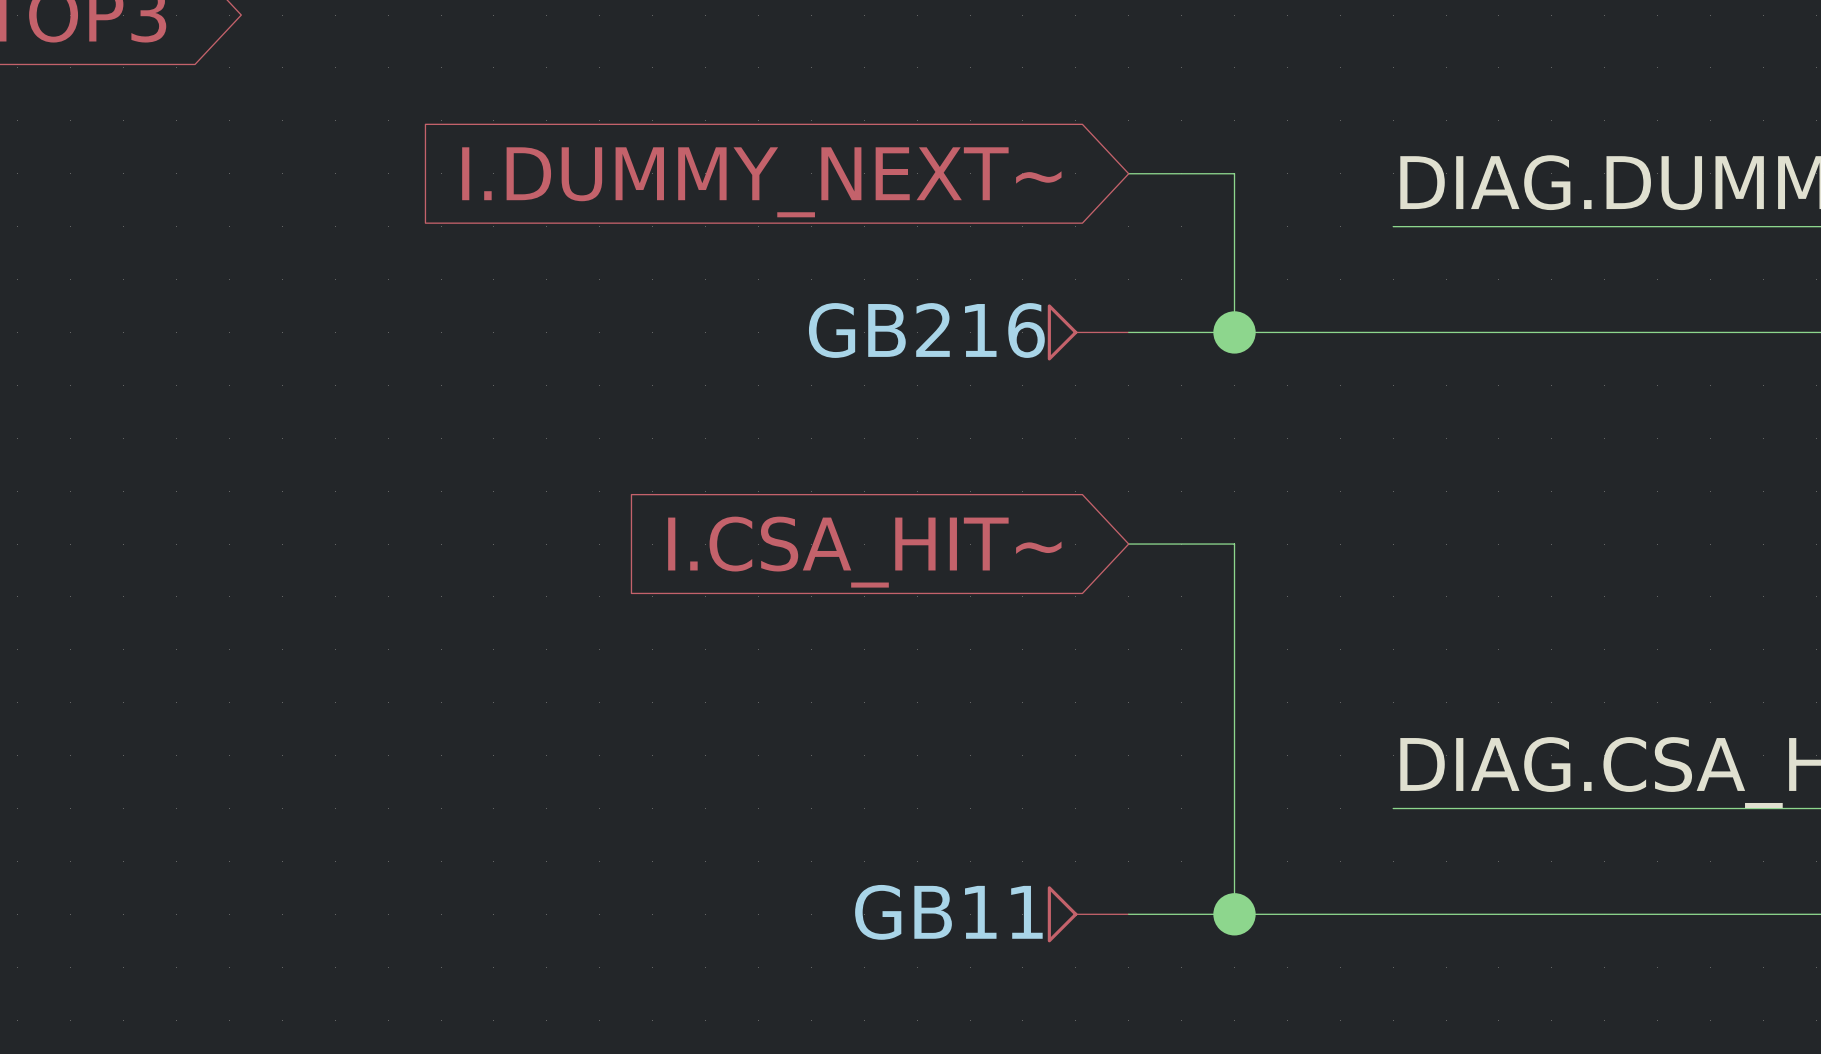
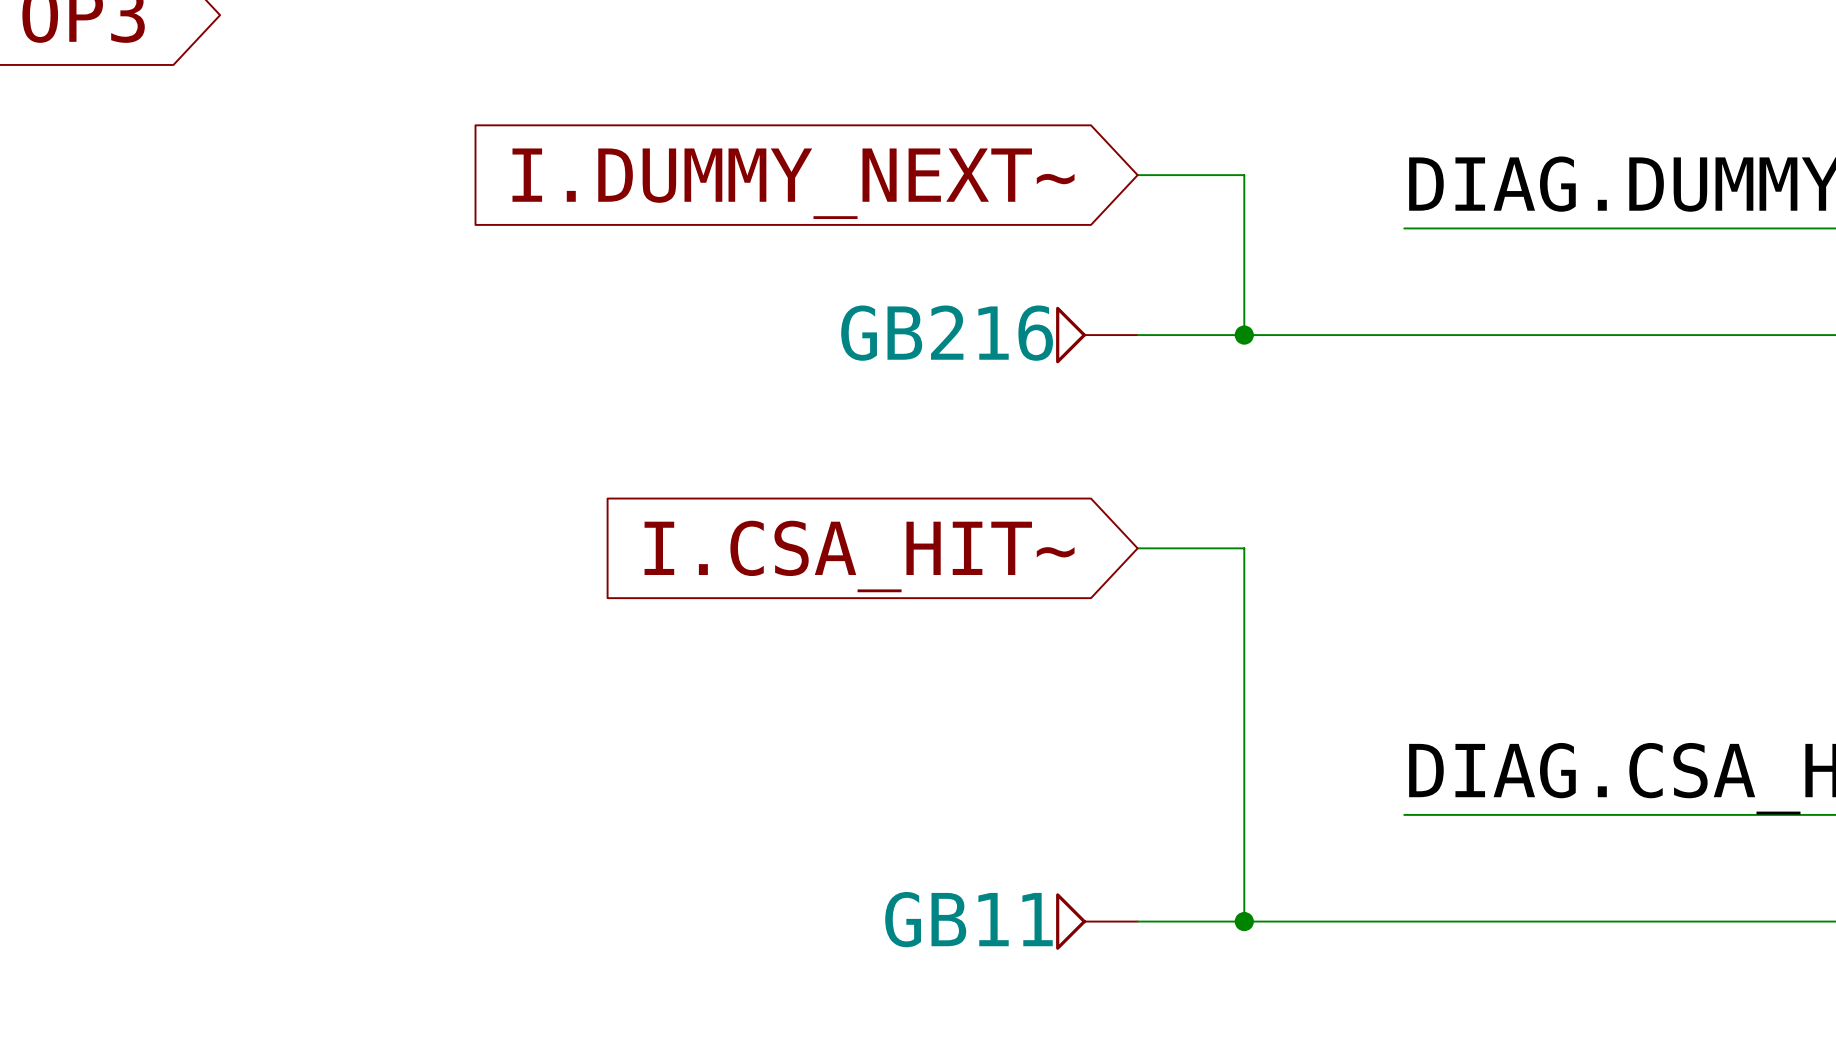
junction size: [1213, 311, 1256, 354] -> [1234, 325, 1254, 345]
junction size: [1213, 893, 1256, 936] -> [1234, 911, 1254, 932]

